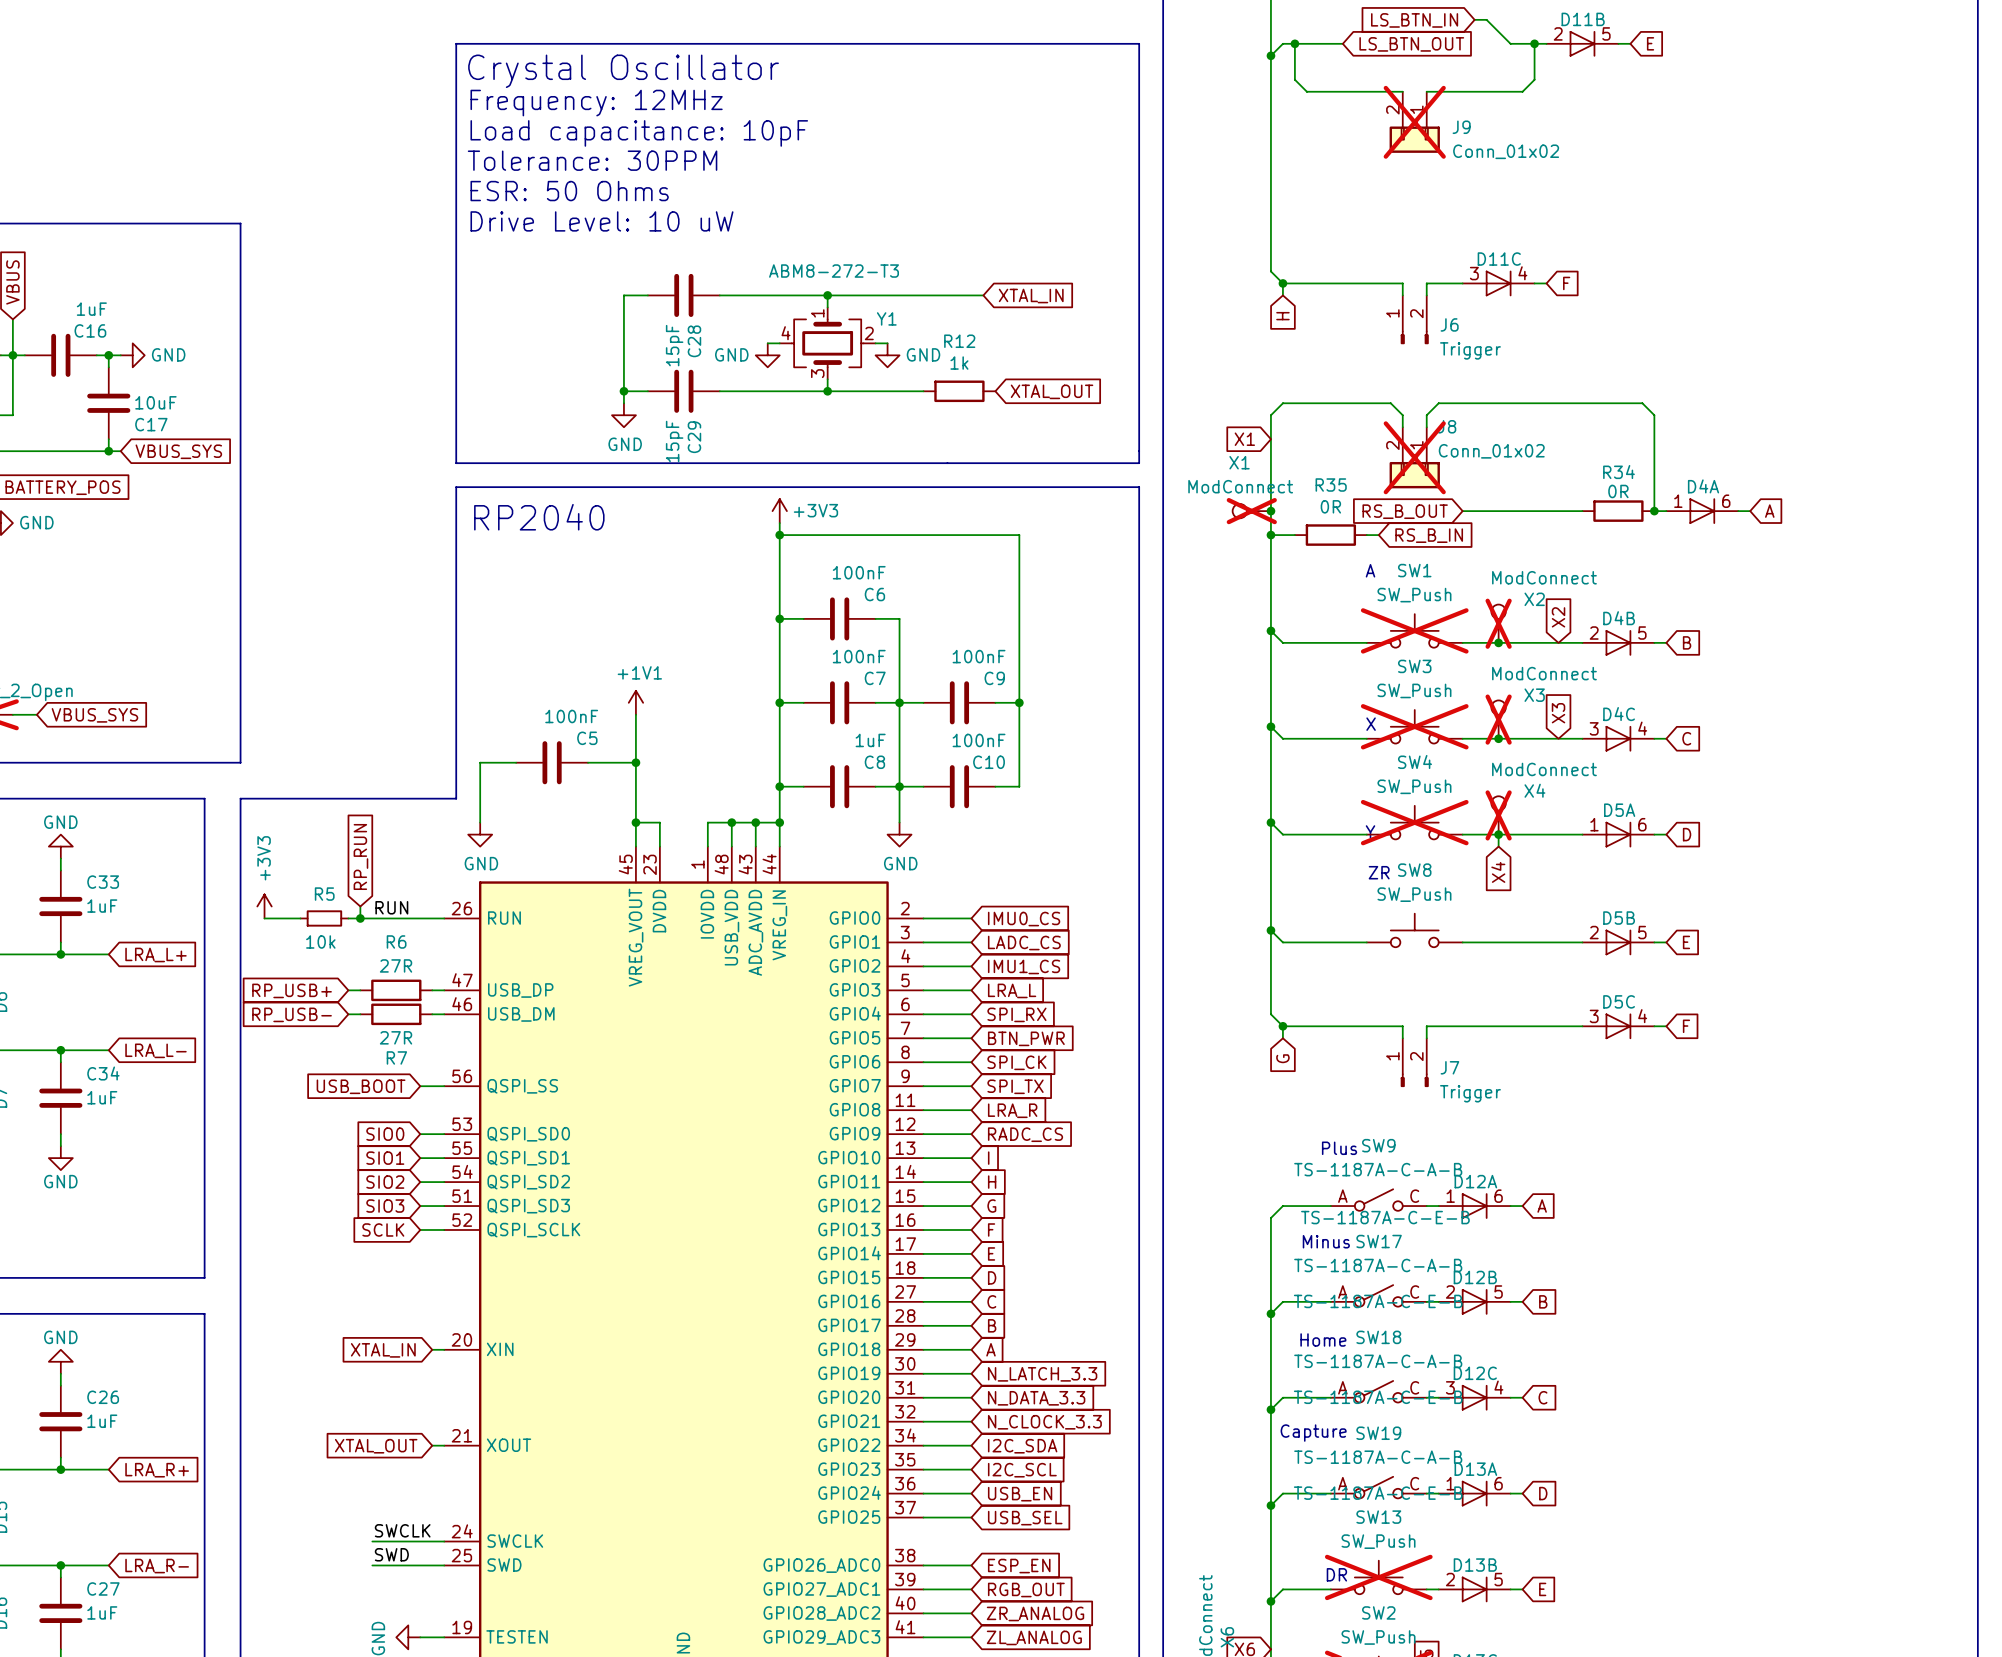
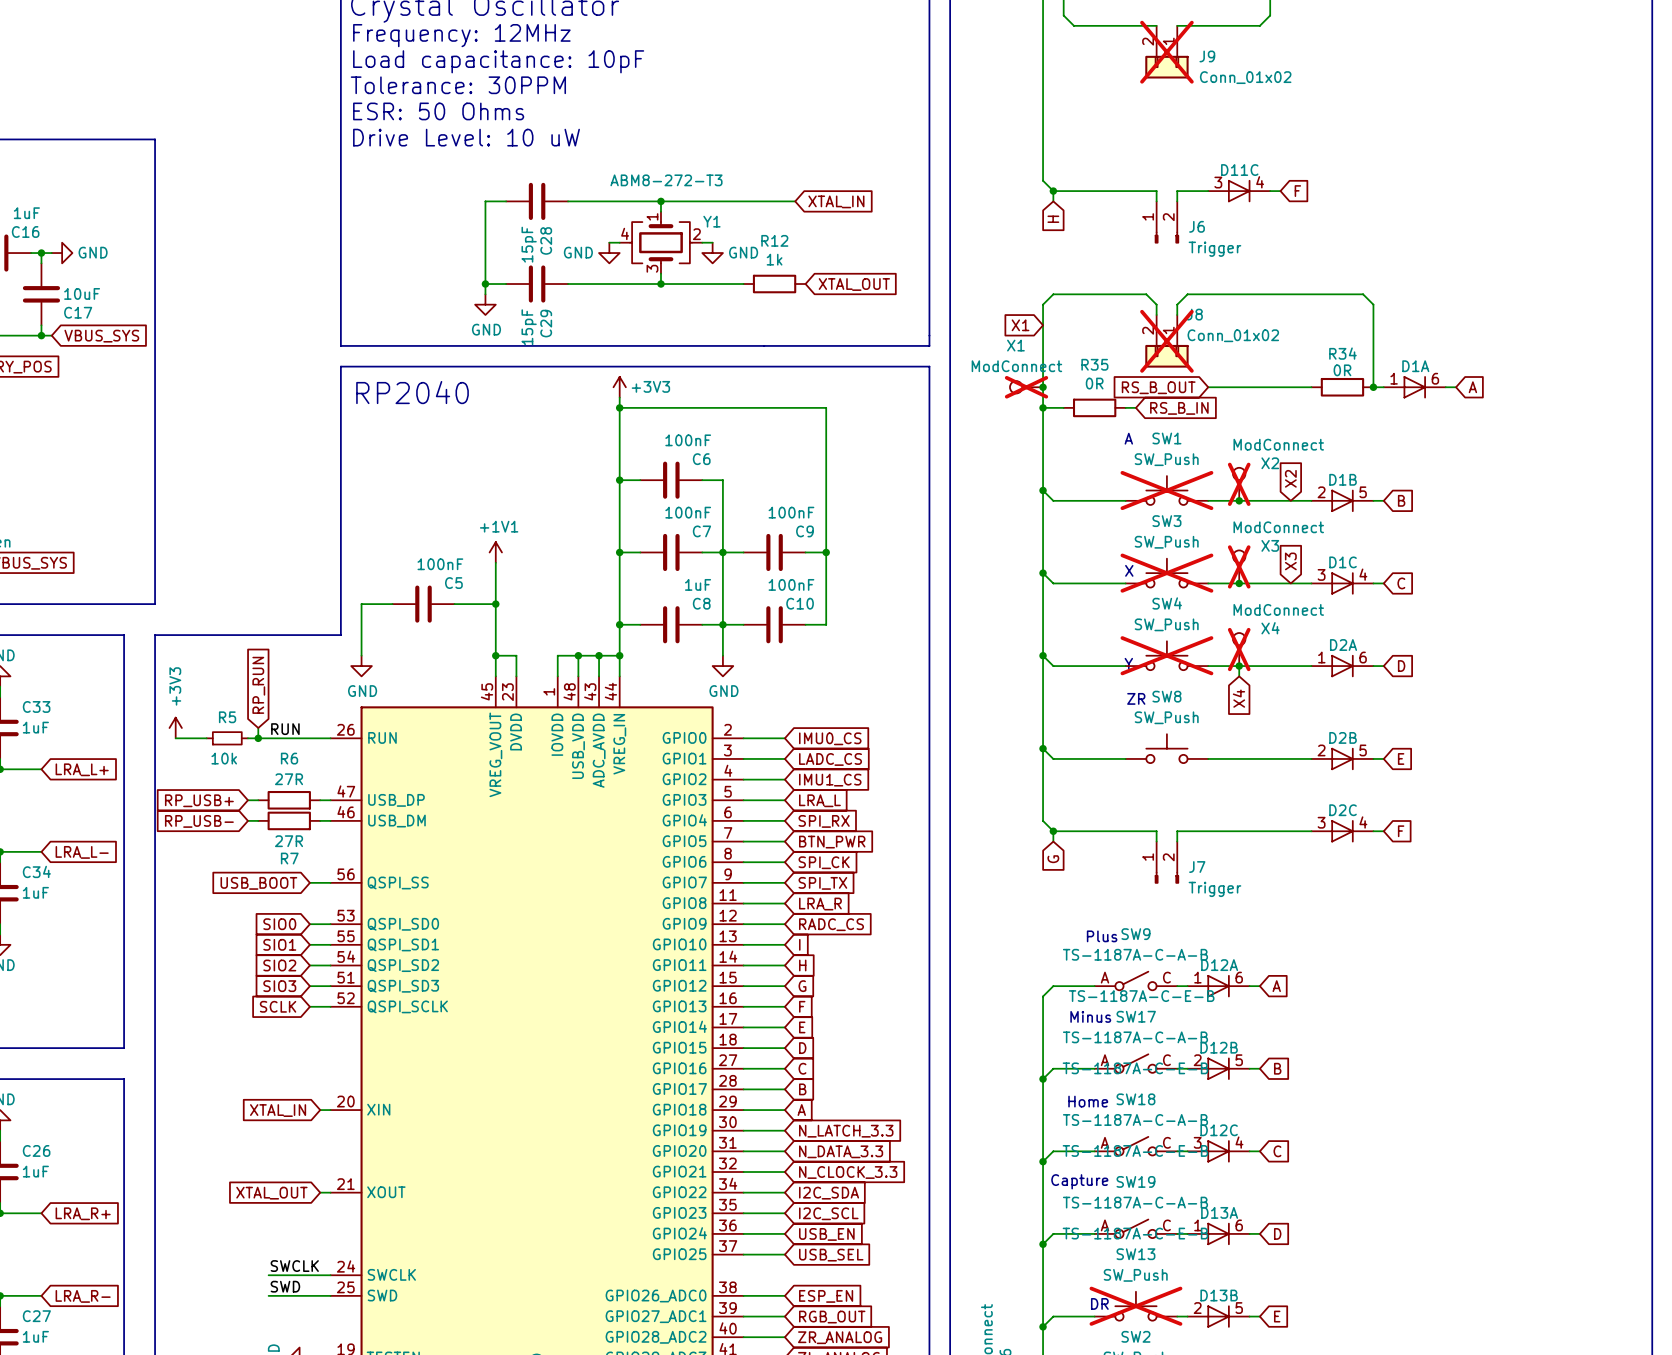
D4A name: D4A (1703, 486) -> D1A (1415, 366)
D4B name: D4B (1619, 618) -> D1B (1343, 479)
D4C name: D4C (1619, 714) -> D1C (1343, 562)
D5A name: D5A (1619, 810) -> D2A (1343, 645)
D5B name: D5B (1619, 918) -> D2B (1343, 737)
D5C name: D5C (1619, 1001) -> D2C (1343, 810)

